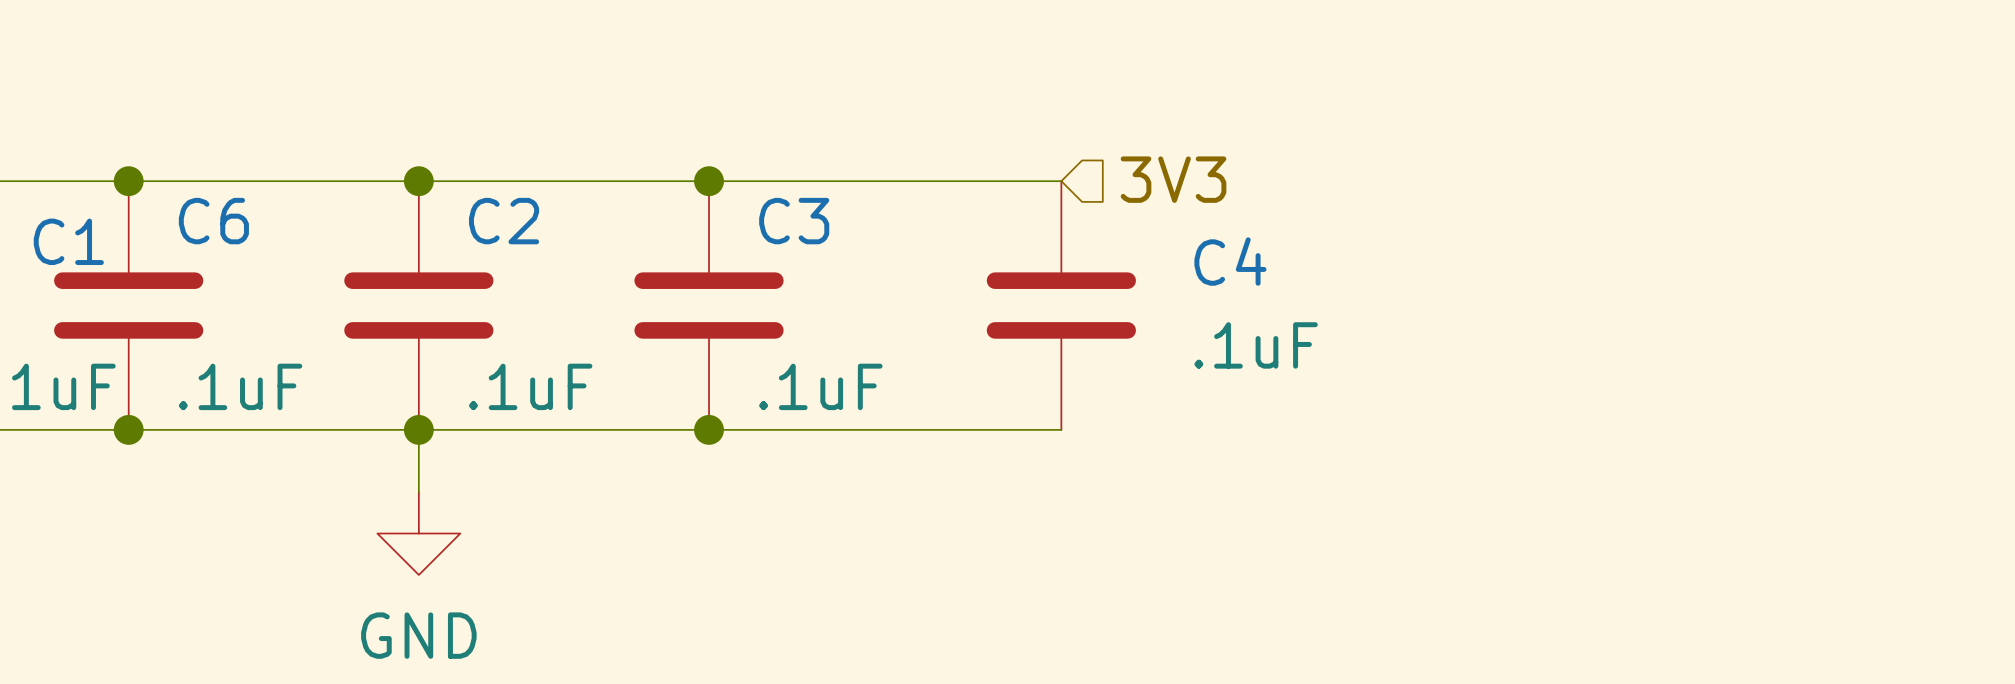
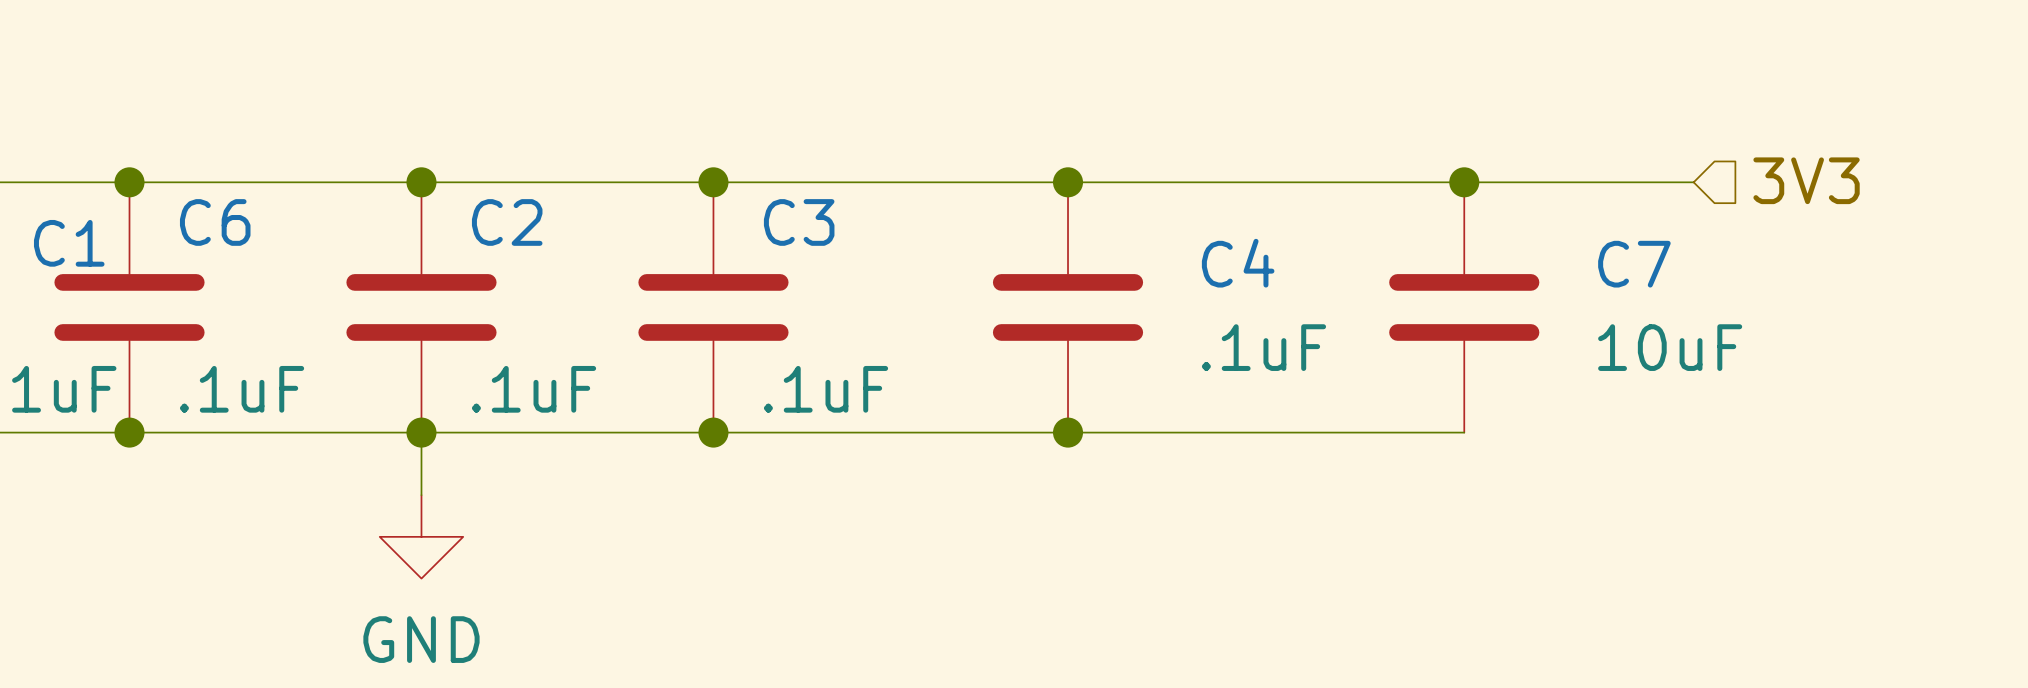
hierarchical label position: 3V3 (1173, 179) -> 3V3 (1806, 180)
wire: none -> (1068, 182) (1693, 182)
junction: none -> (1068, 182)
junction: none -> (1464, 182)
C7: none -> 10uF (1464, 307)
wire: none -> (1068, 432) (1464, 432)
junction: none -> (1068, 432)

